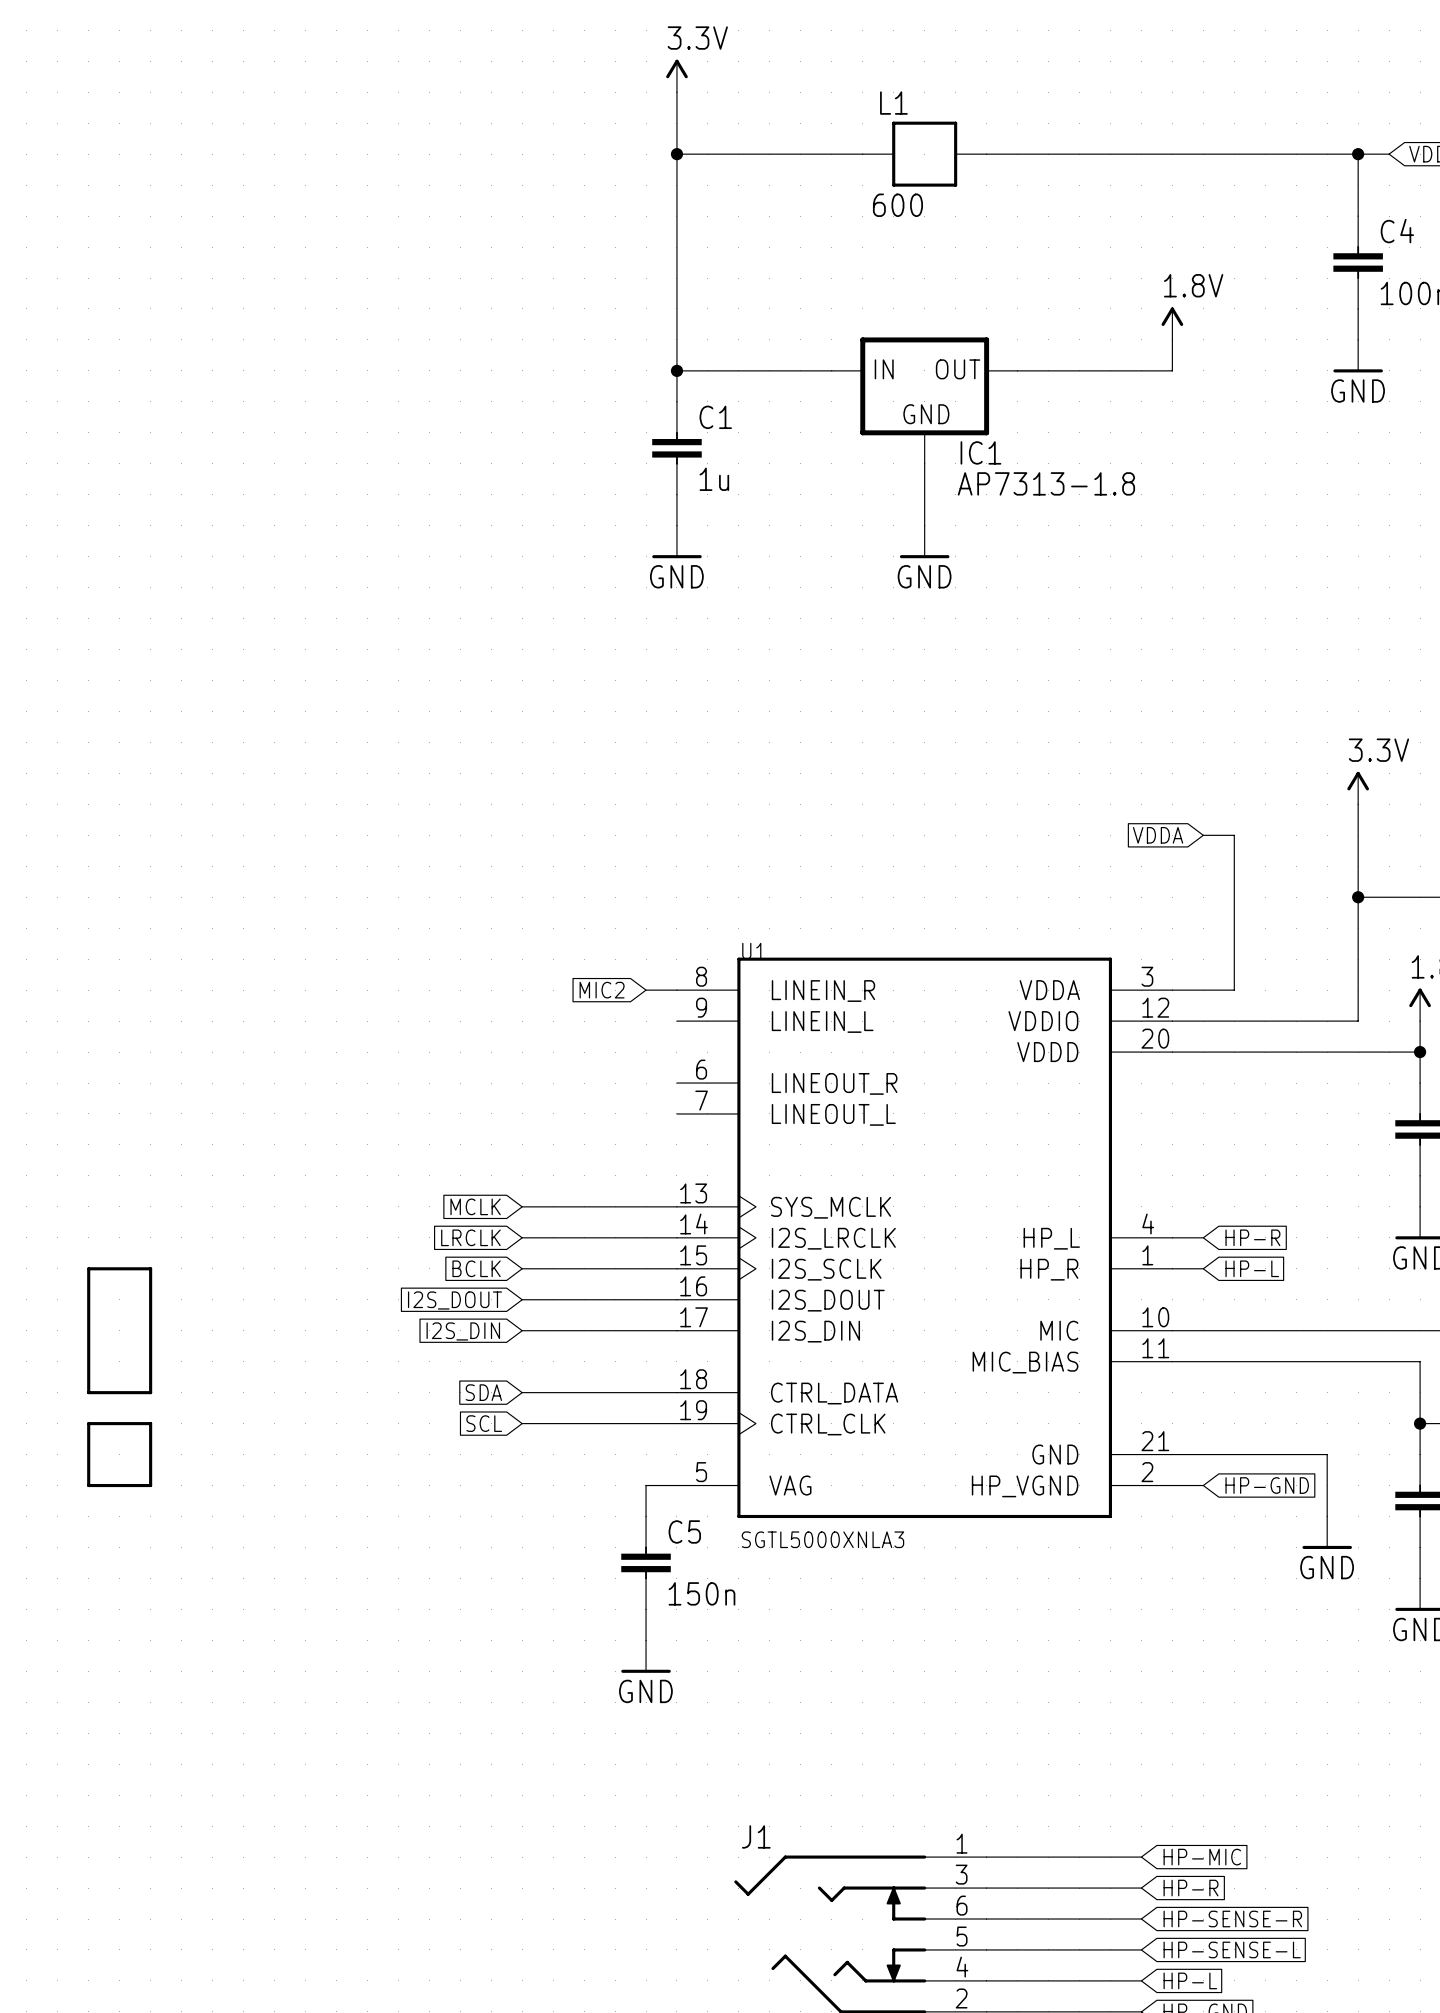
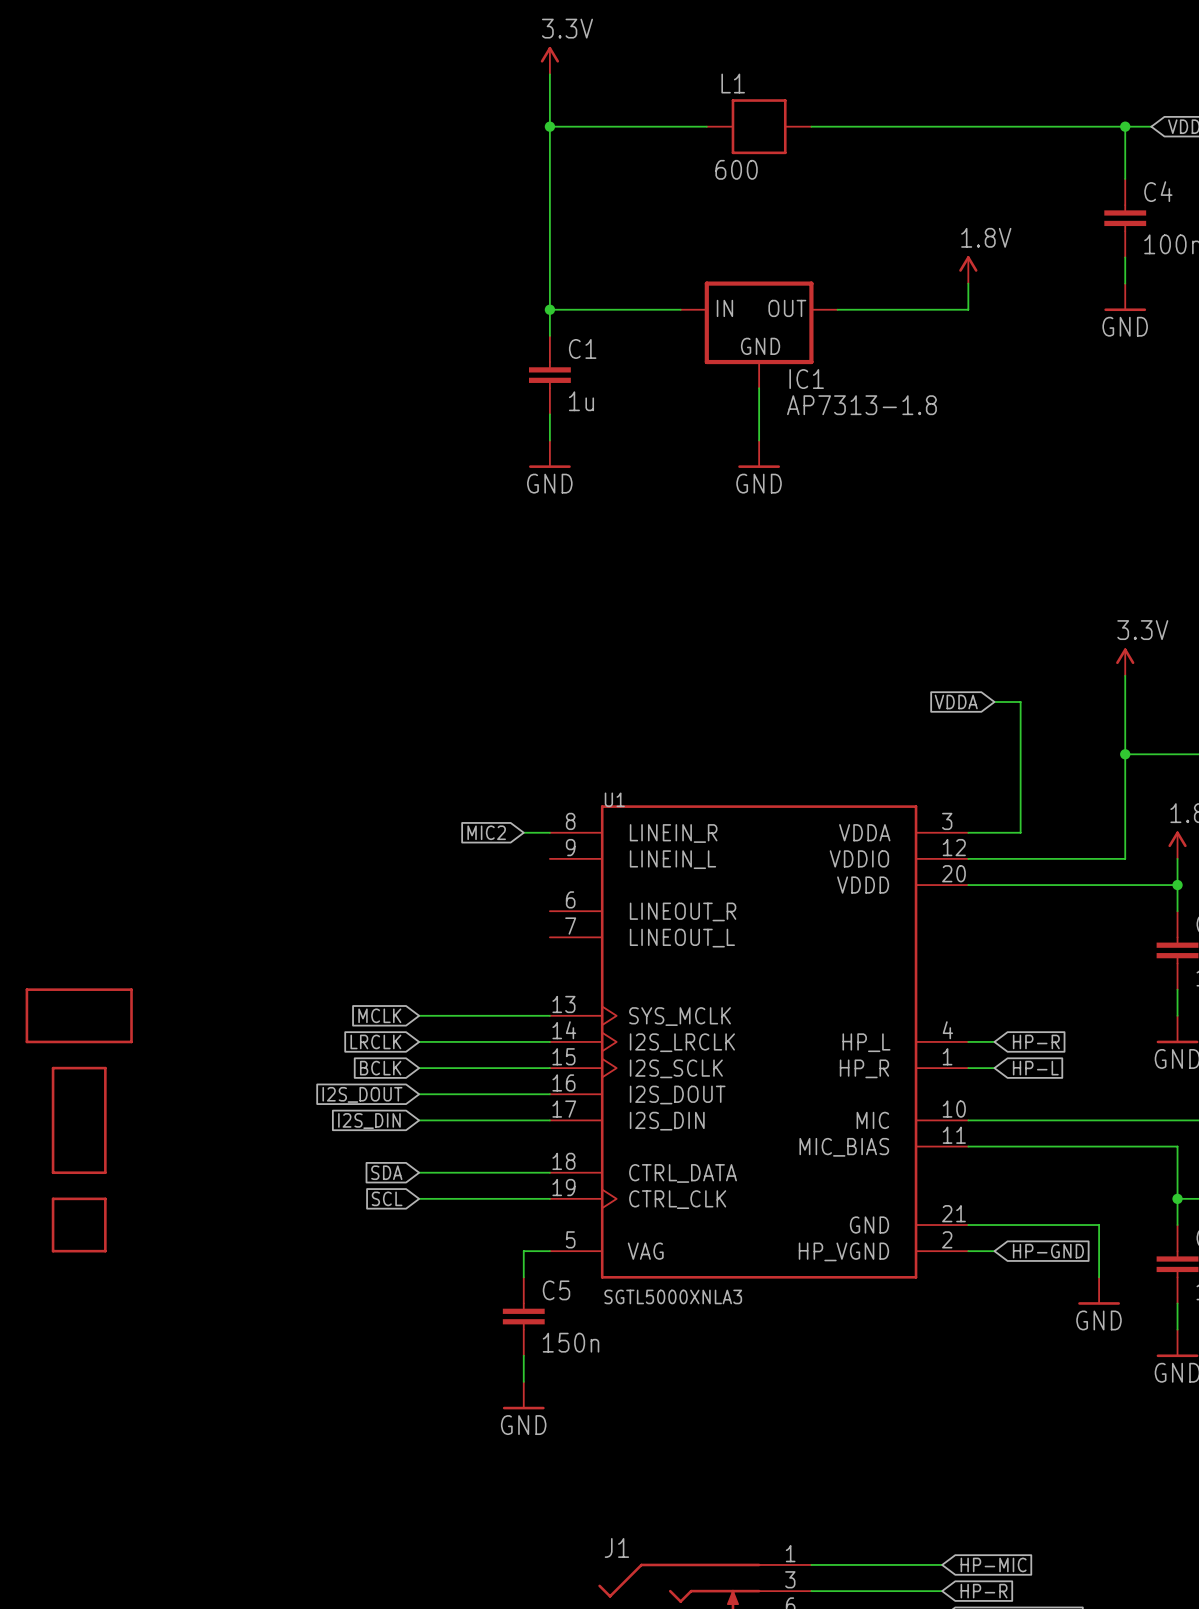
part: none -> (79, 1015)

